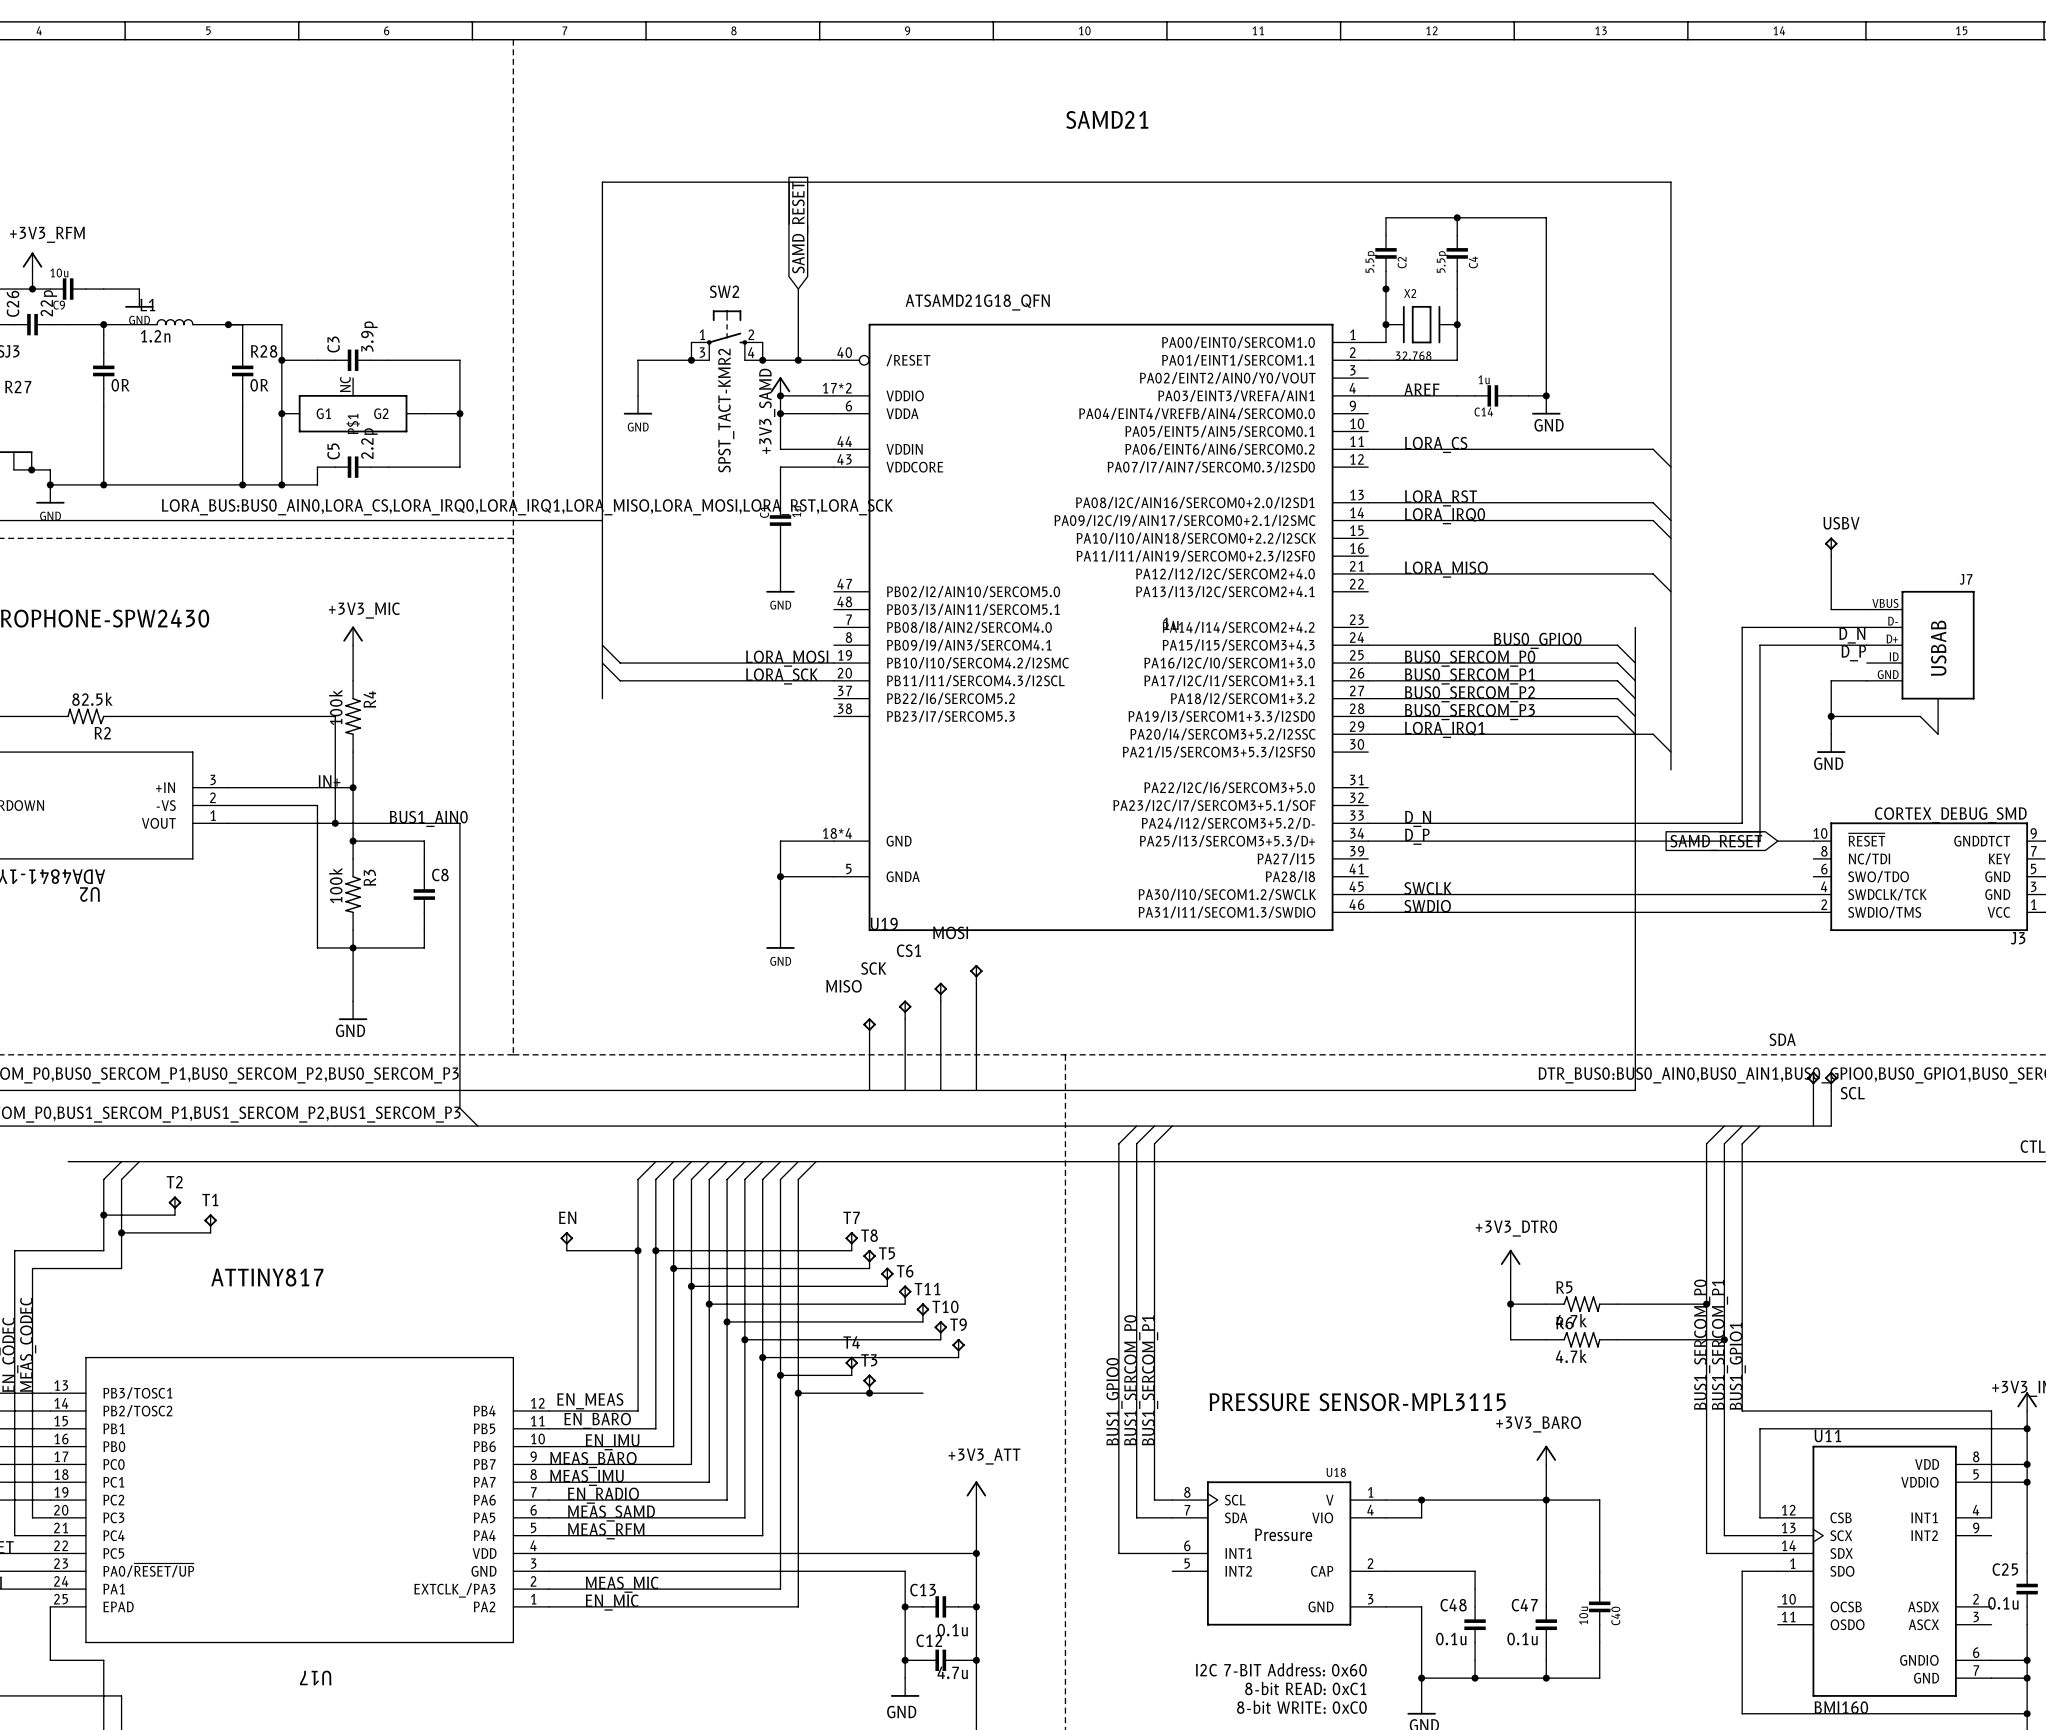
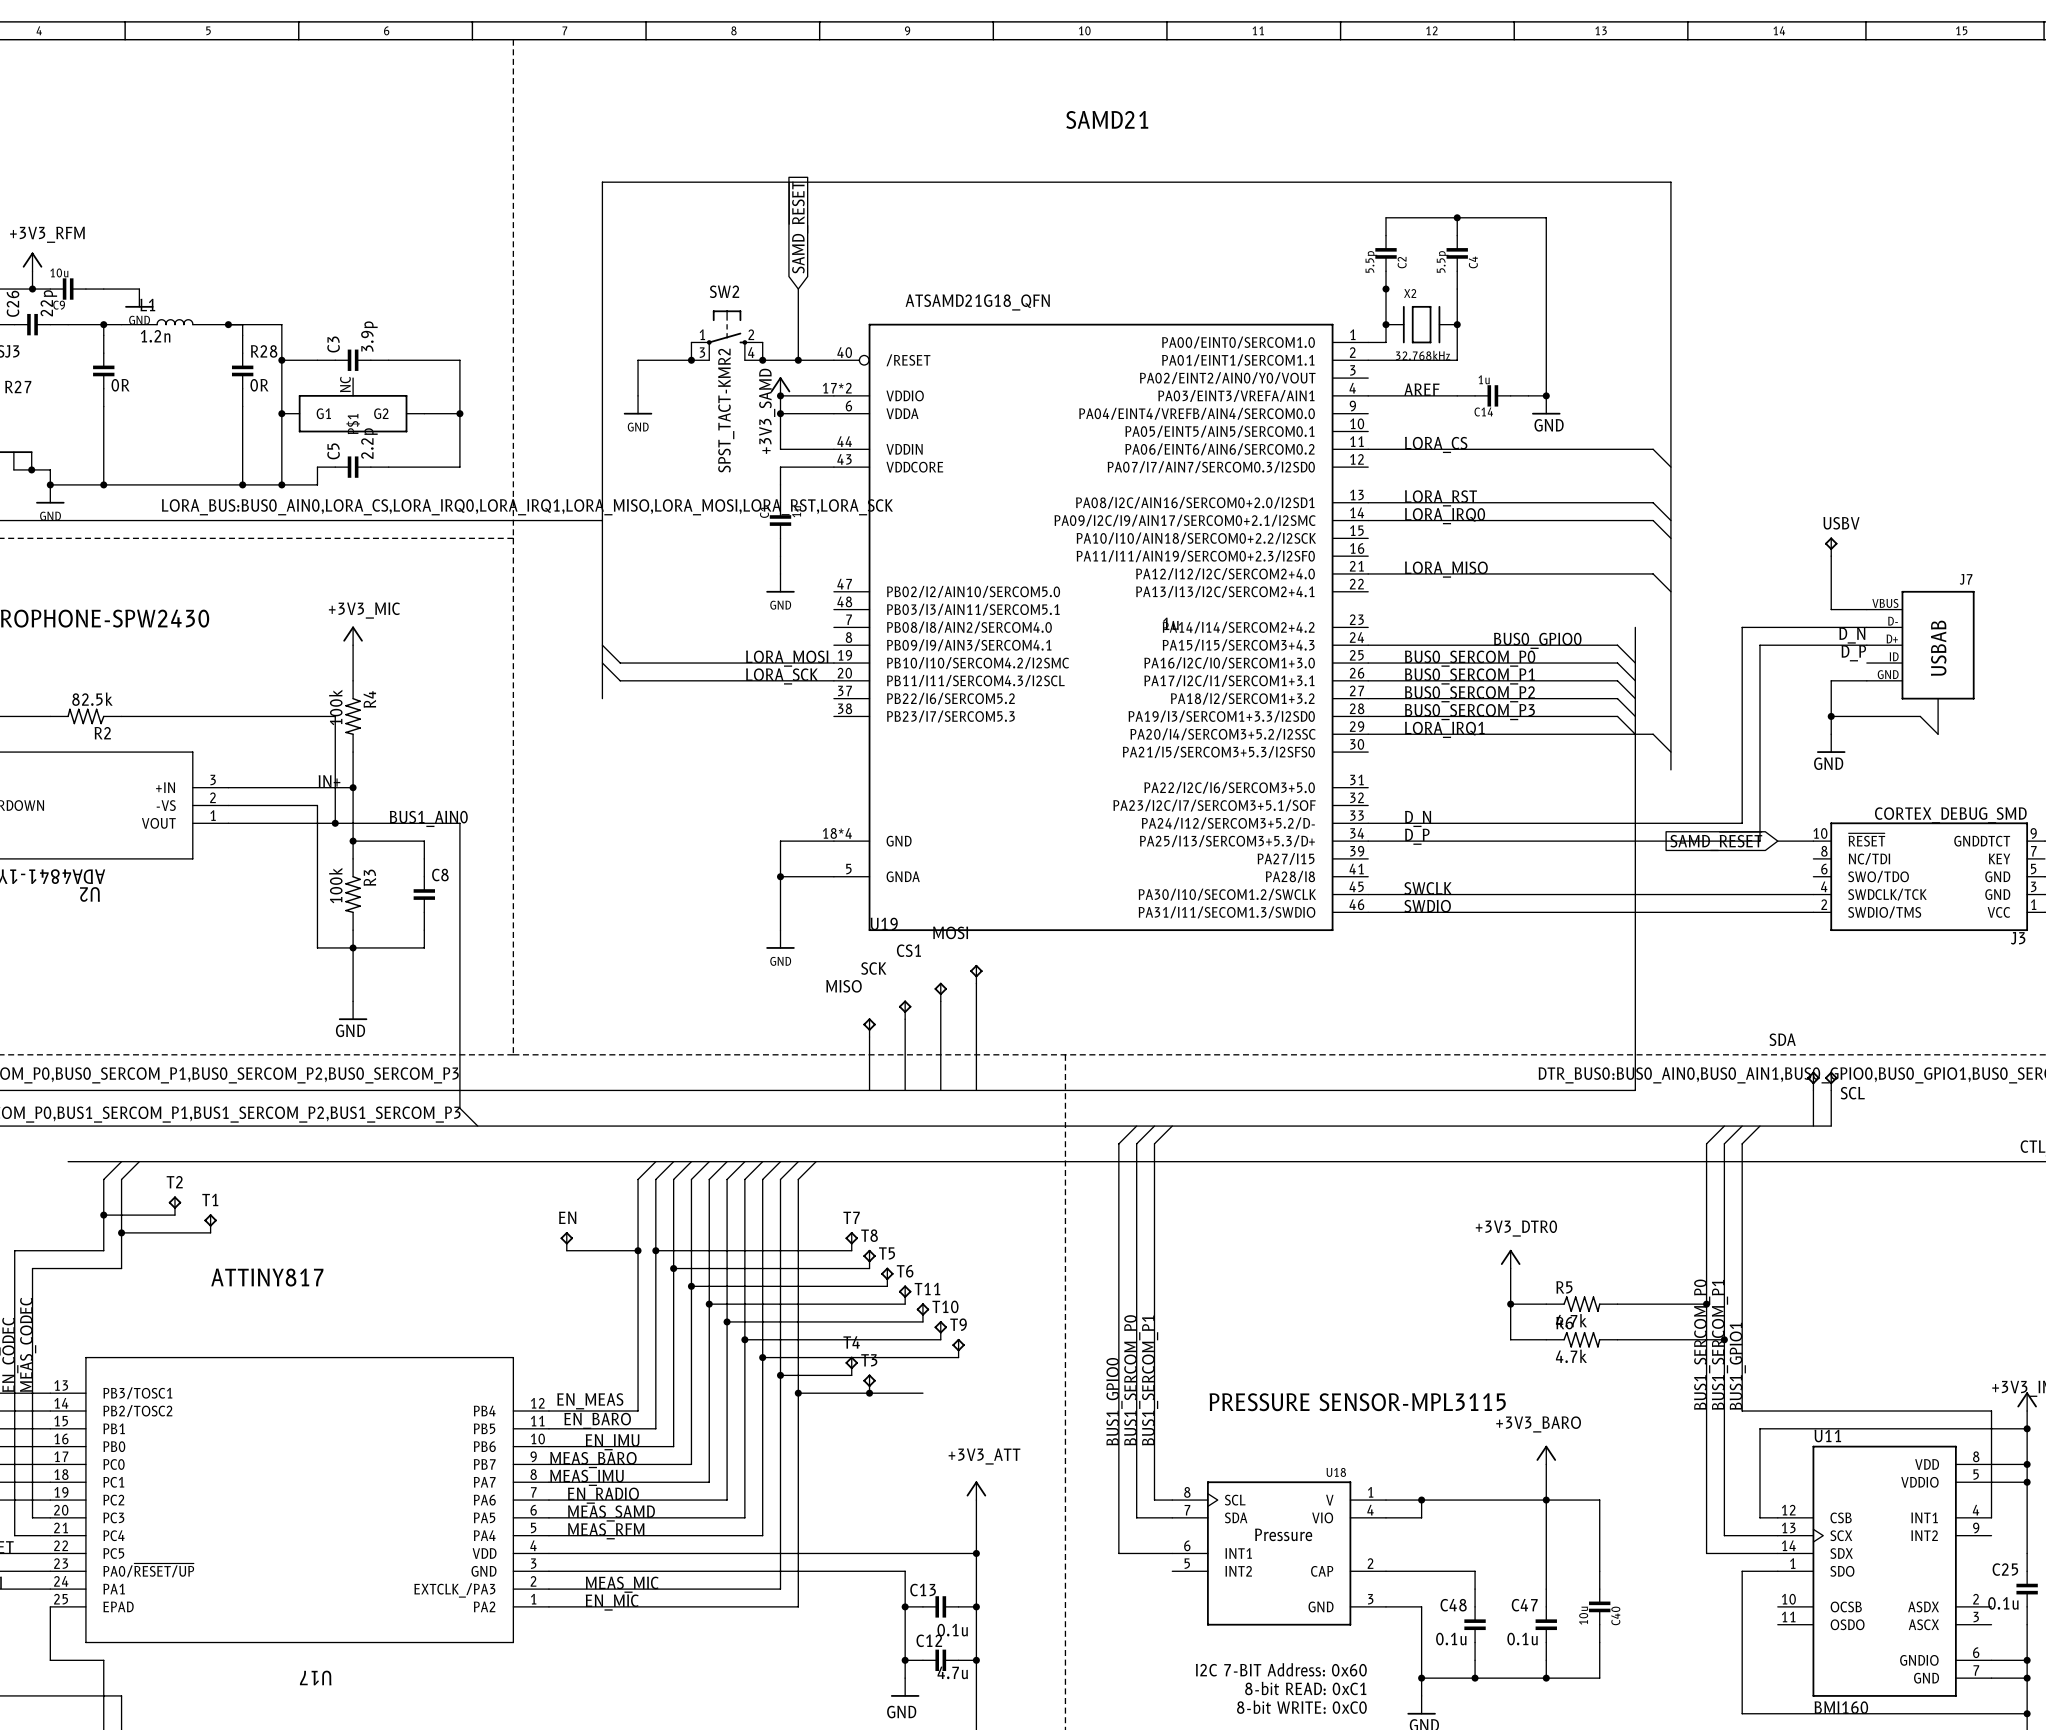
X2 value: 32.768 (1413, 355) -> 32.768kHz (1423, 355)

